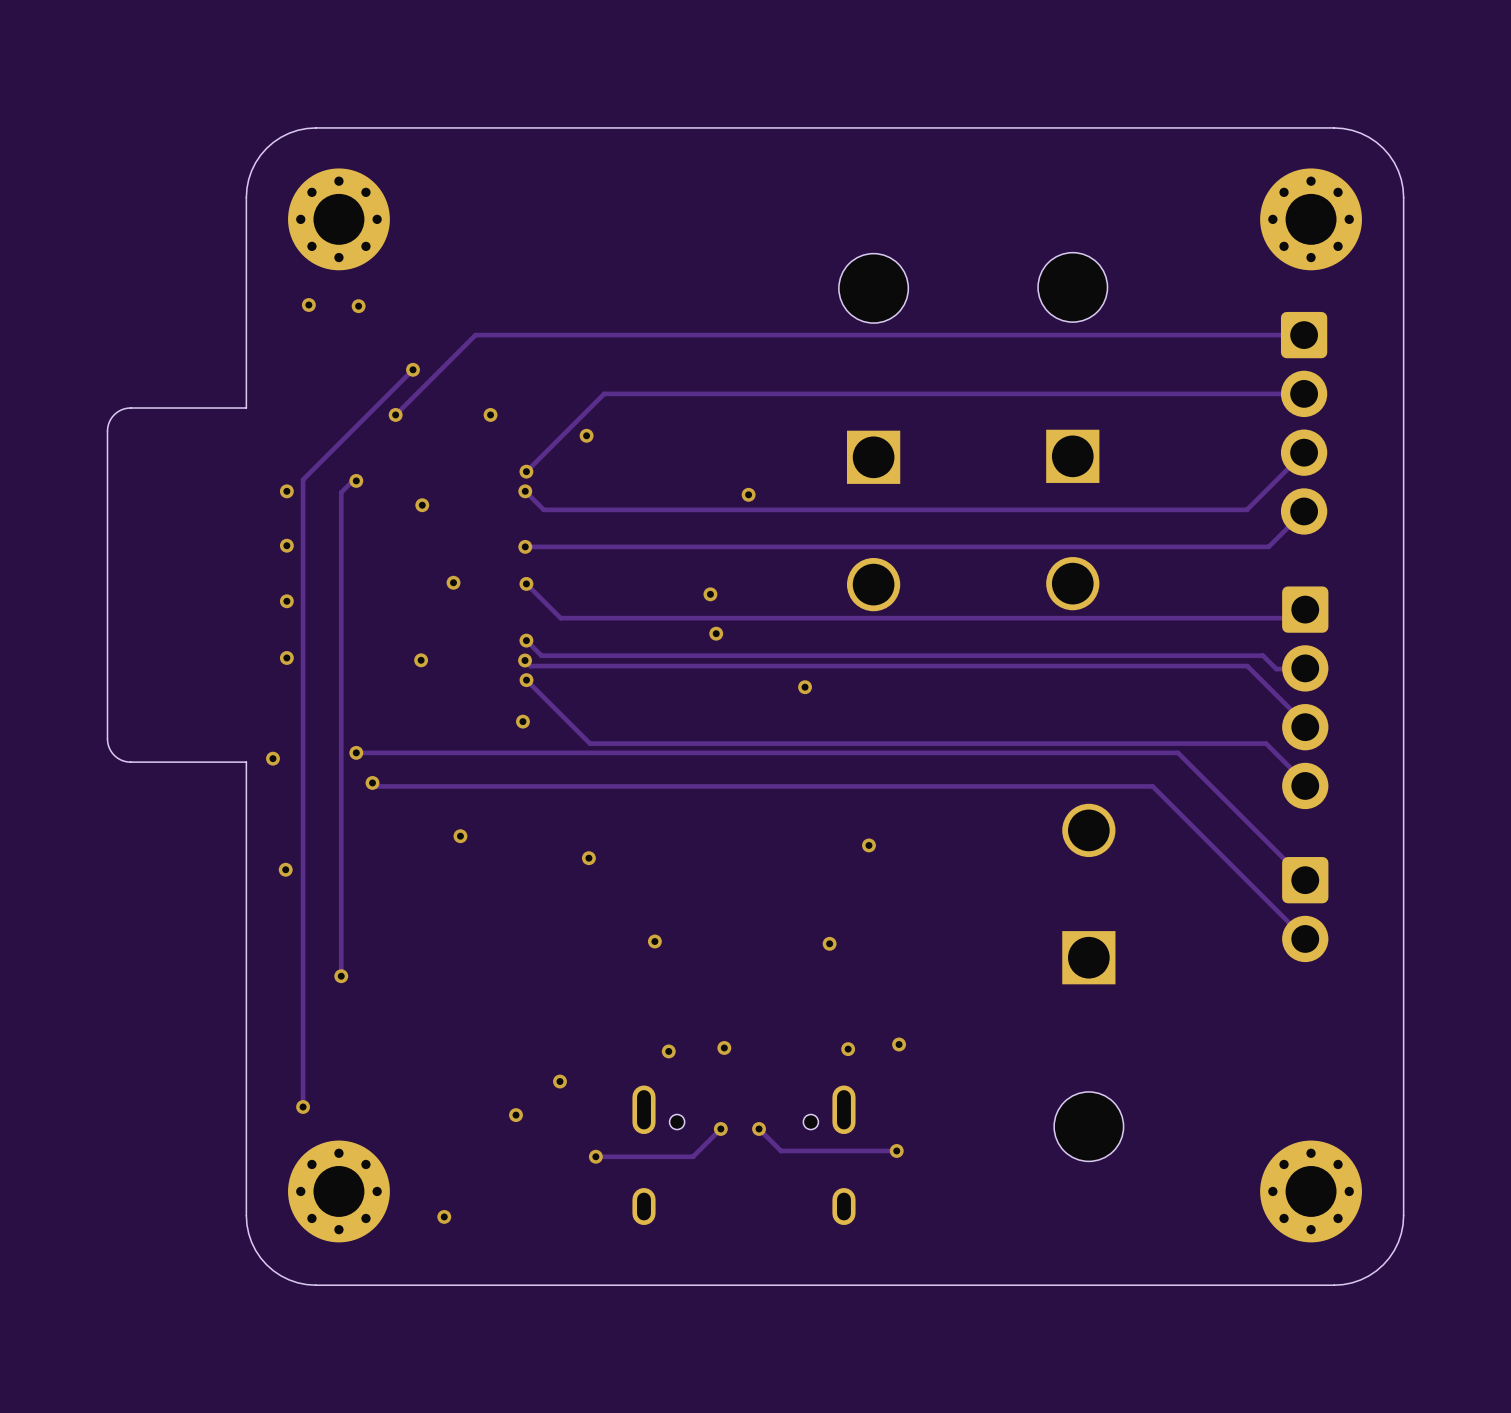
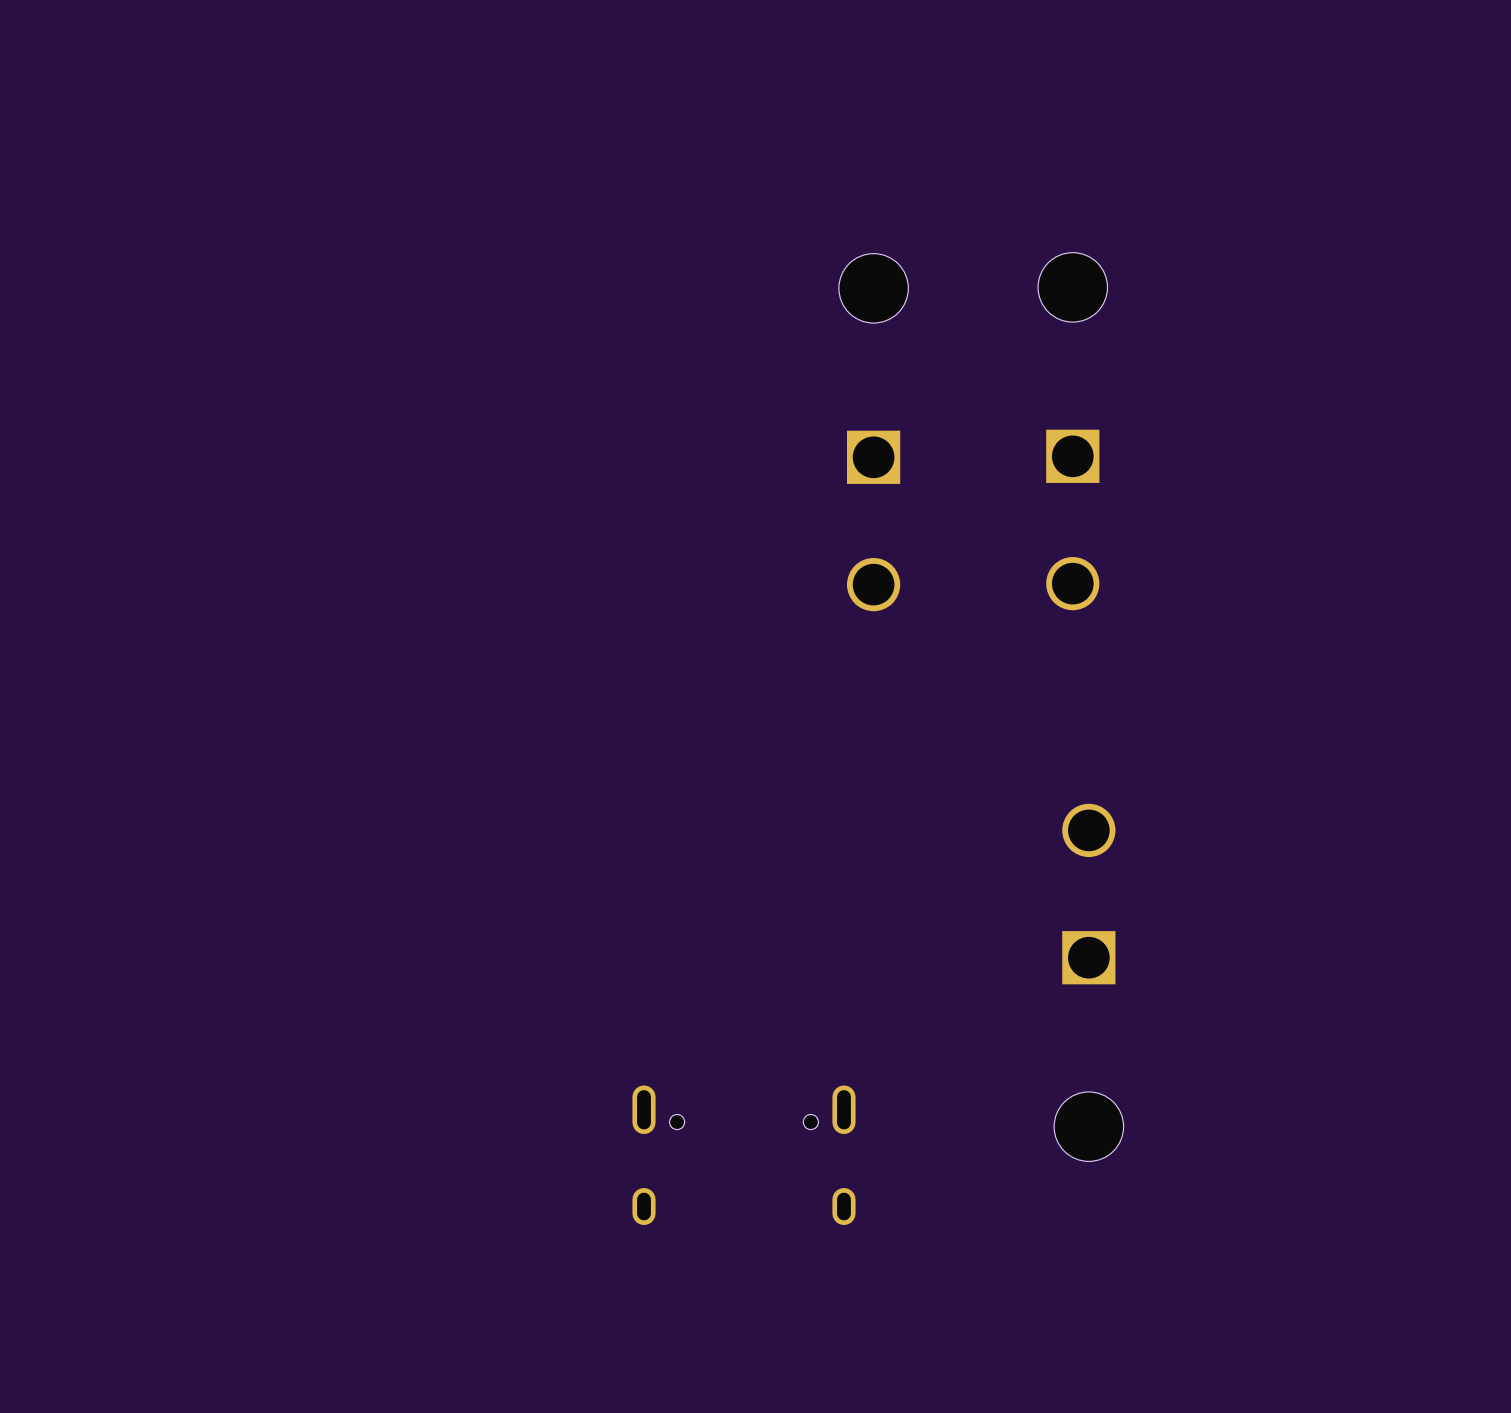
board edge: (1334, 127) (315, 127) (289, 133) (266, 148) (251, 170) (246, 188) (246, 408) (128, 408) (116, 413) (108, 426) (107, 738) (112, 753) (118, 758) (128, 761) (246, 762) (246, 1215) (251, 1242) (266, 1264) (289, 1279) (315, 1285) (1334, 1285) (1360, 1279) (1383, 1264) (1398, 1242) (1403, 1215) (1403, 197) (1398, 170) (1383, 148) (1360, 133) (1334, 127) -> none
part: (338, 219) -> none
part: (1311, 219) -> none
via: (308, 305) -> none
via: (358, 306) -> none
track: (1304, 335) (475, 335) (395, 414) -> none
track: (413, 369) (303, 479) (303, 1106) -> none
via: (413, 369) -> none
track: (1304, 393) (604, 393) (526, 471) -> none
via: (395, 414) -> none
via: (490, 414) -> none
part: (1304, 423) -> none
via: (586, 435) -> none
track: (1304, 452) (1246, 509) (543, 509) (525, 491) -> none
via: (526, 471) -> none
track: (356, 480) (352, 480) (341, 492) (341, 976) -> none
via: (356, 480) -> none
via: (286, 491) -> none
via: (525, 491) -> none
via: (748, 494) -> none
via: (422, 505) -> none
track: (1304, 511) (1268, 546) (525, 546) -> none
via: (286, 545) -> none
via: (525, 546) -> none
via: (453, 582) -> none
track: (526, 583) (560, 618) (1301, 618) (1309, 610) -> none
via: (526, 583) -> none
via: (710, 594) -> none
via: (286, 601) -> none
via: (716, 633) -> none
track: (526, 640) (541, 655) (1262, 655) (1276, 669) (1309, 669) -> none
via: (526, 640) -> none
via: (286, 657) -> none
via: (421, 660) -> none
track: (525, 660) (530, 666) (1247, 666) (1309, 727) -> none
via: (525, 660) -> none
track: (526, 680) (590, 743) (1266, 743) (1309, 786) -> none
via: (526, 680) -> none
via: (805, 687) -> none
part: (1305, 697) -> none
via: (522, 721) -> none
track: (356, 752) (1177, 752) (1305, 880) -> none
via: (356, 752) -> none
via: (272, 758) -> none
track: (372, 782) (375, 786) (1152, 786) (1305, 938) -> none
via: (372, 782) -> none
via: (460, 836) -> none
via: (868, 845) -> none
via: (588, 858) -> none
via: (285, 869) -> none
part: (1305, 909) -> none
via: (654, 941) -> none
via: (829, 943) -> none
via: (341, 976) -> none
via: (899, 1044) -> none
via: (724, 1047) -> none
via: (848, 1049) -> none
via: (668, 1051) -> none
via: (559, 1081) -> none
via: (303, 1106) -> none
via: (516, 1115) -> none
track: (720, 1128) (693, 1156) (595, 1156) -> none
via: (720, 1128) -> none
track: (759, 1128) (781, 1150) (896, 1150) -> none
via: (759, 1128) -> none
via: (896, 1150) -> none
via: (595, 1156) -> none
part: (338, 1191) -> none
part: (1311, 1191) -> none
via: (444, 1216) -> none

